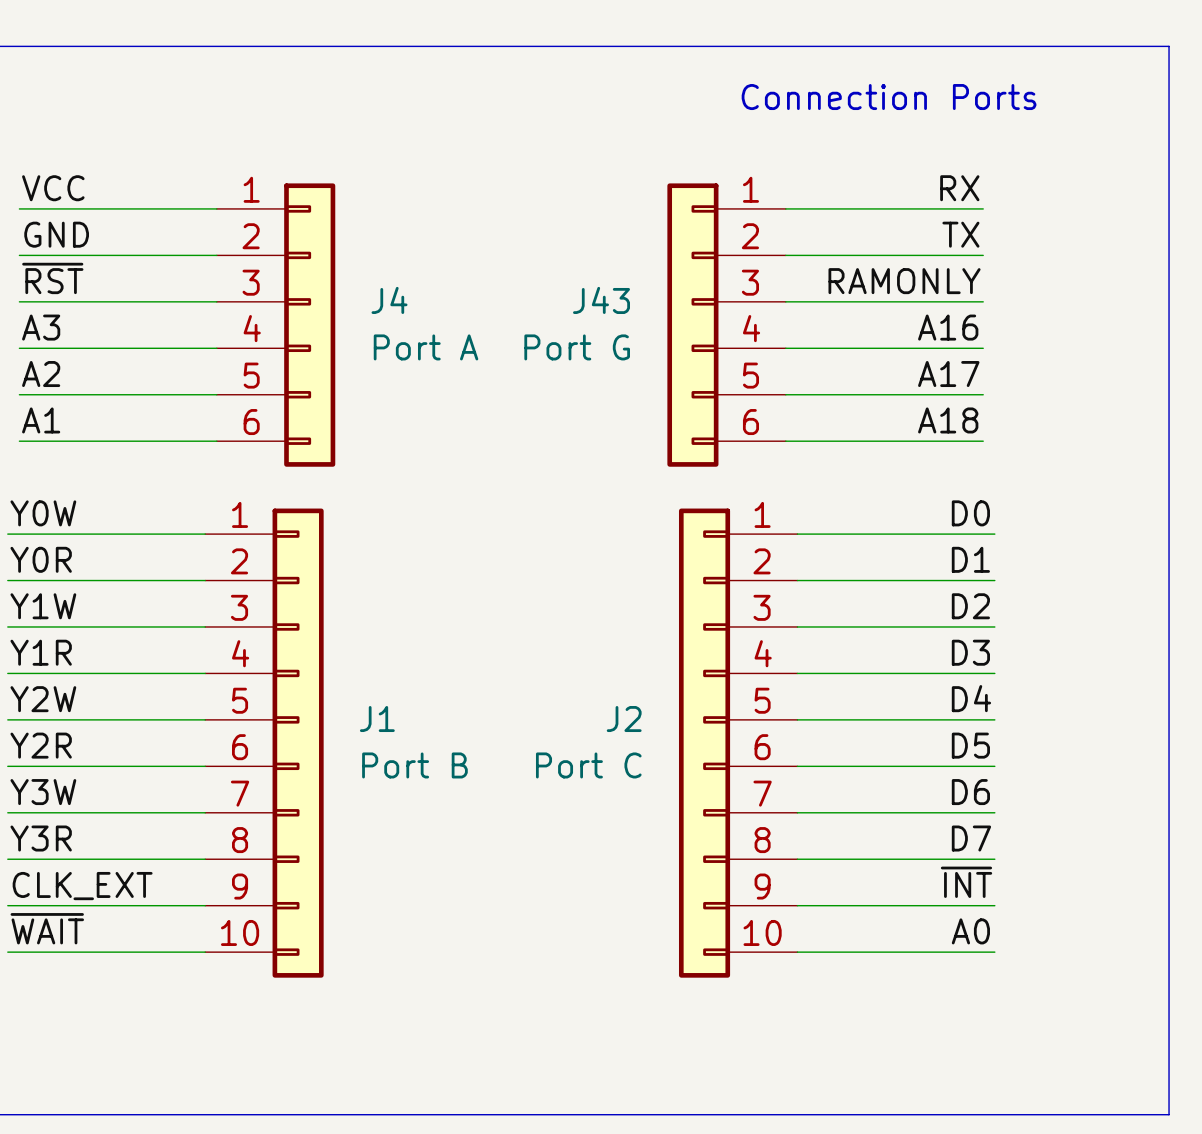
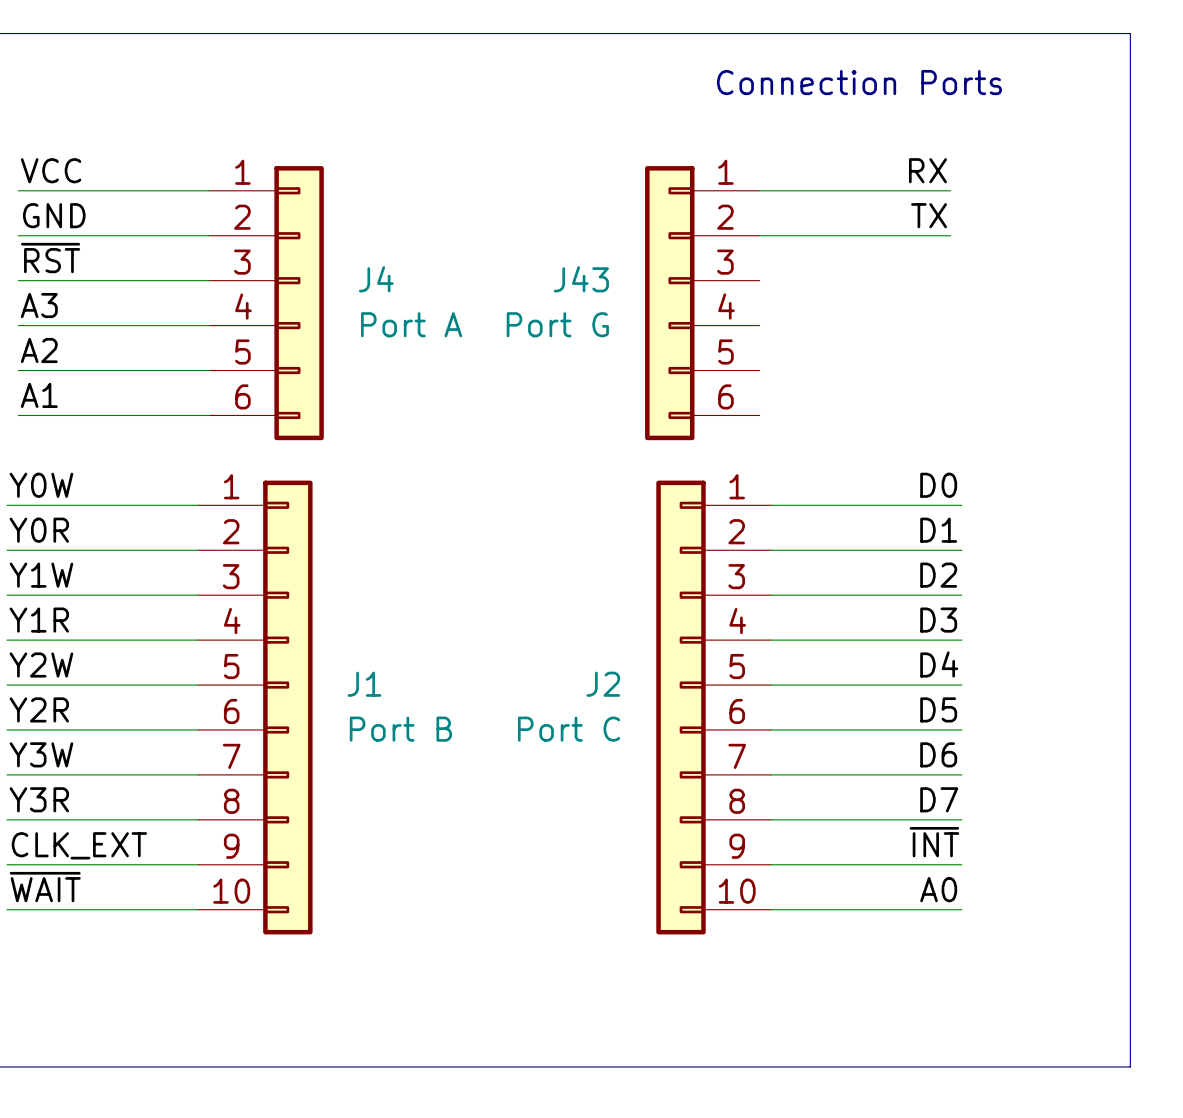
label: RAMONLY (904, 281) -> none
wire: (785, 301) (983, 301) -> none
label: A16 (948, 327) -> none
wire: (785, 348) (983, 348) -> none
label: A17 (948, 374) -> none
wire: (785, 394) (983, 394) -> none
label: A18 (948, 420) -> none
wire: (785, 441) (983, 441) -> none

